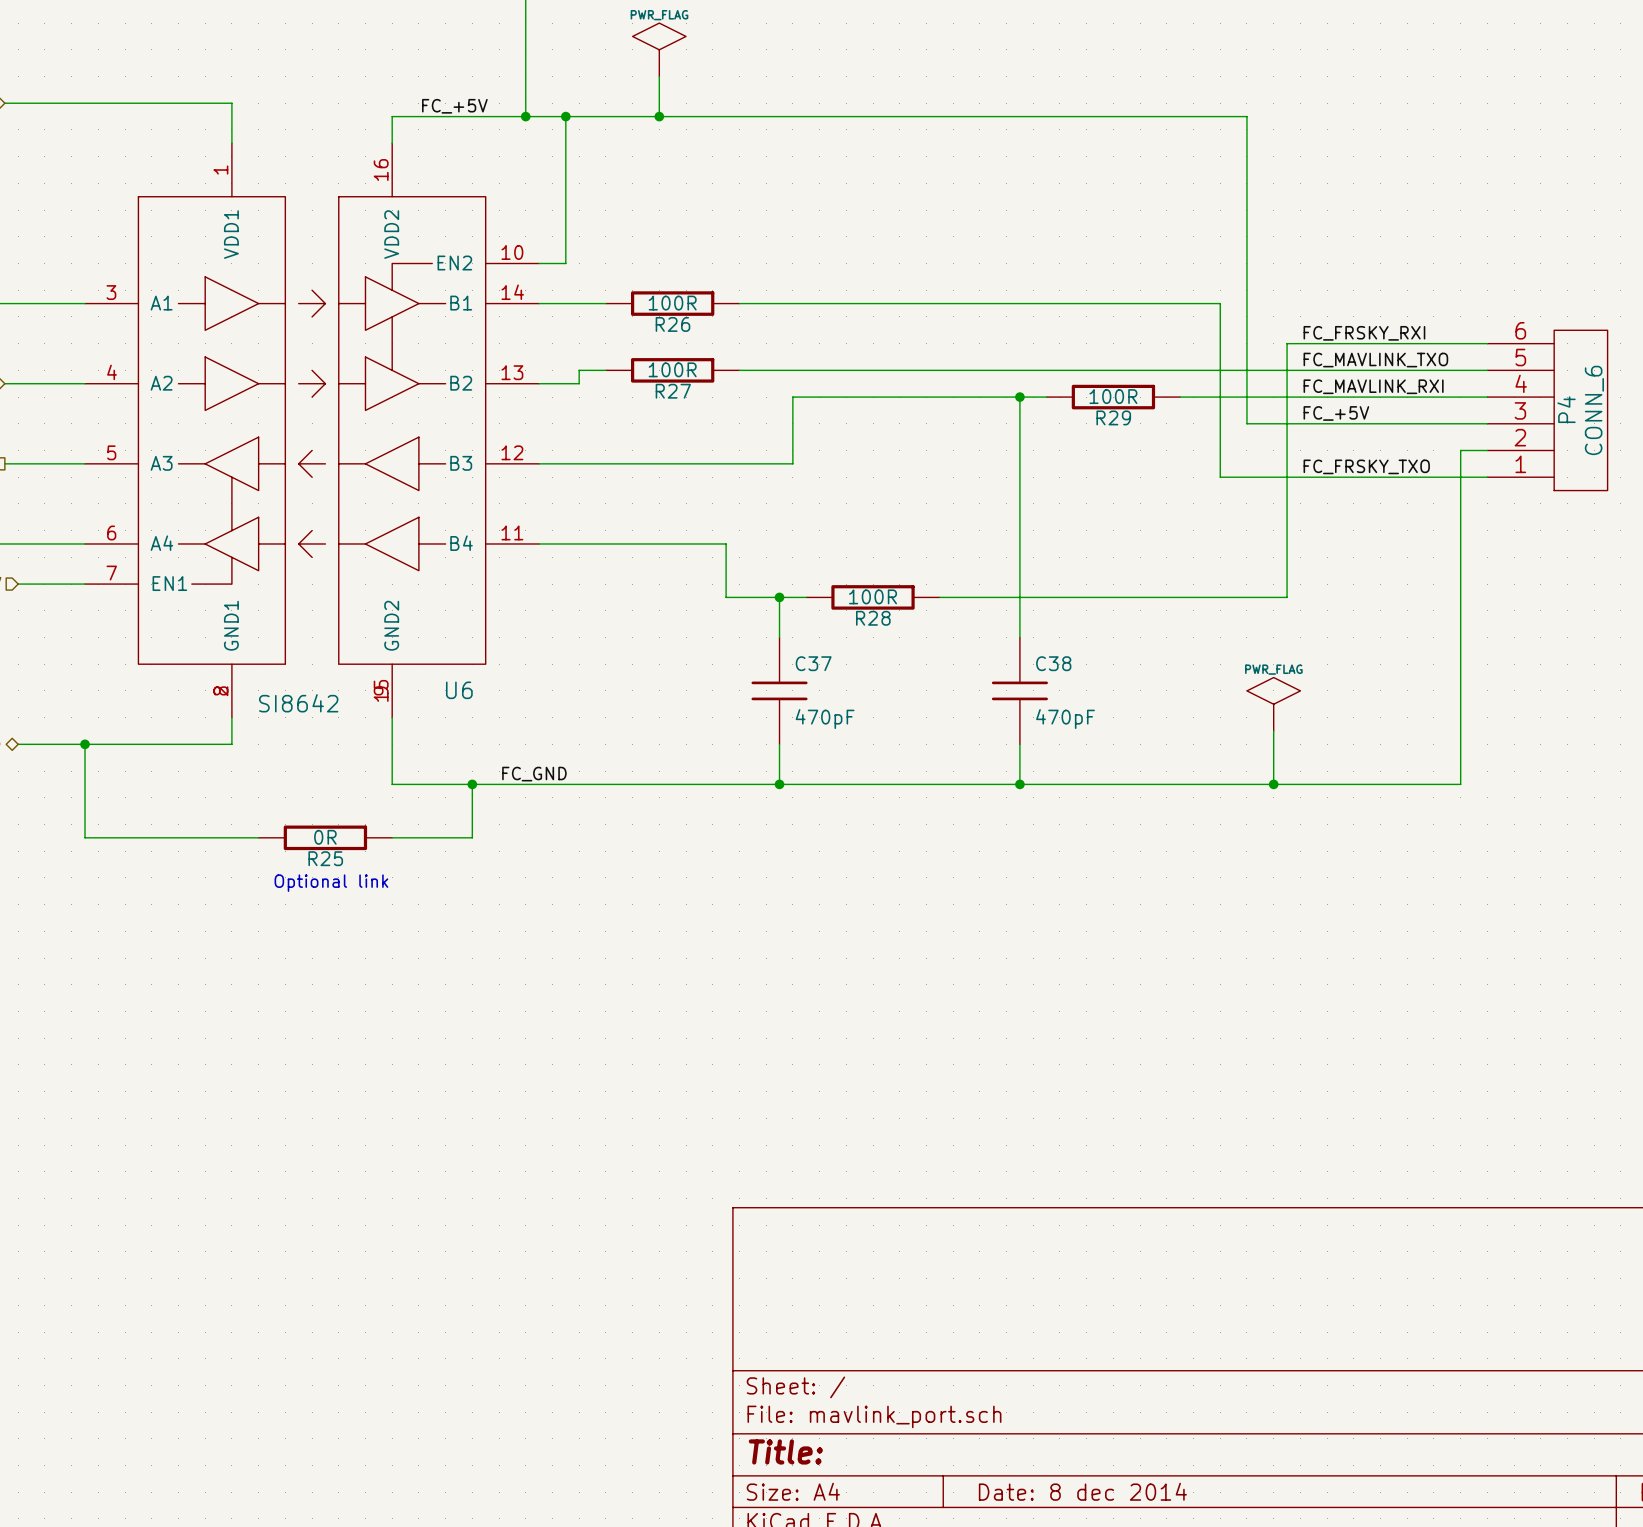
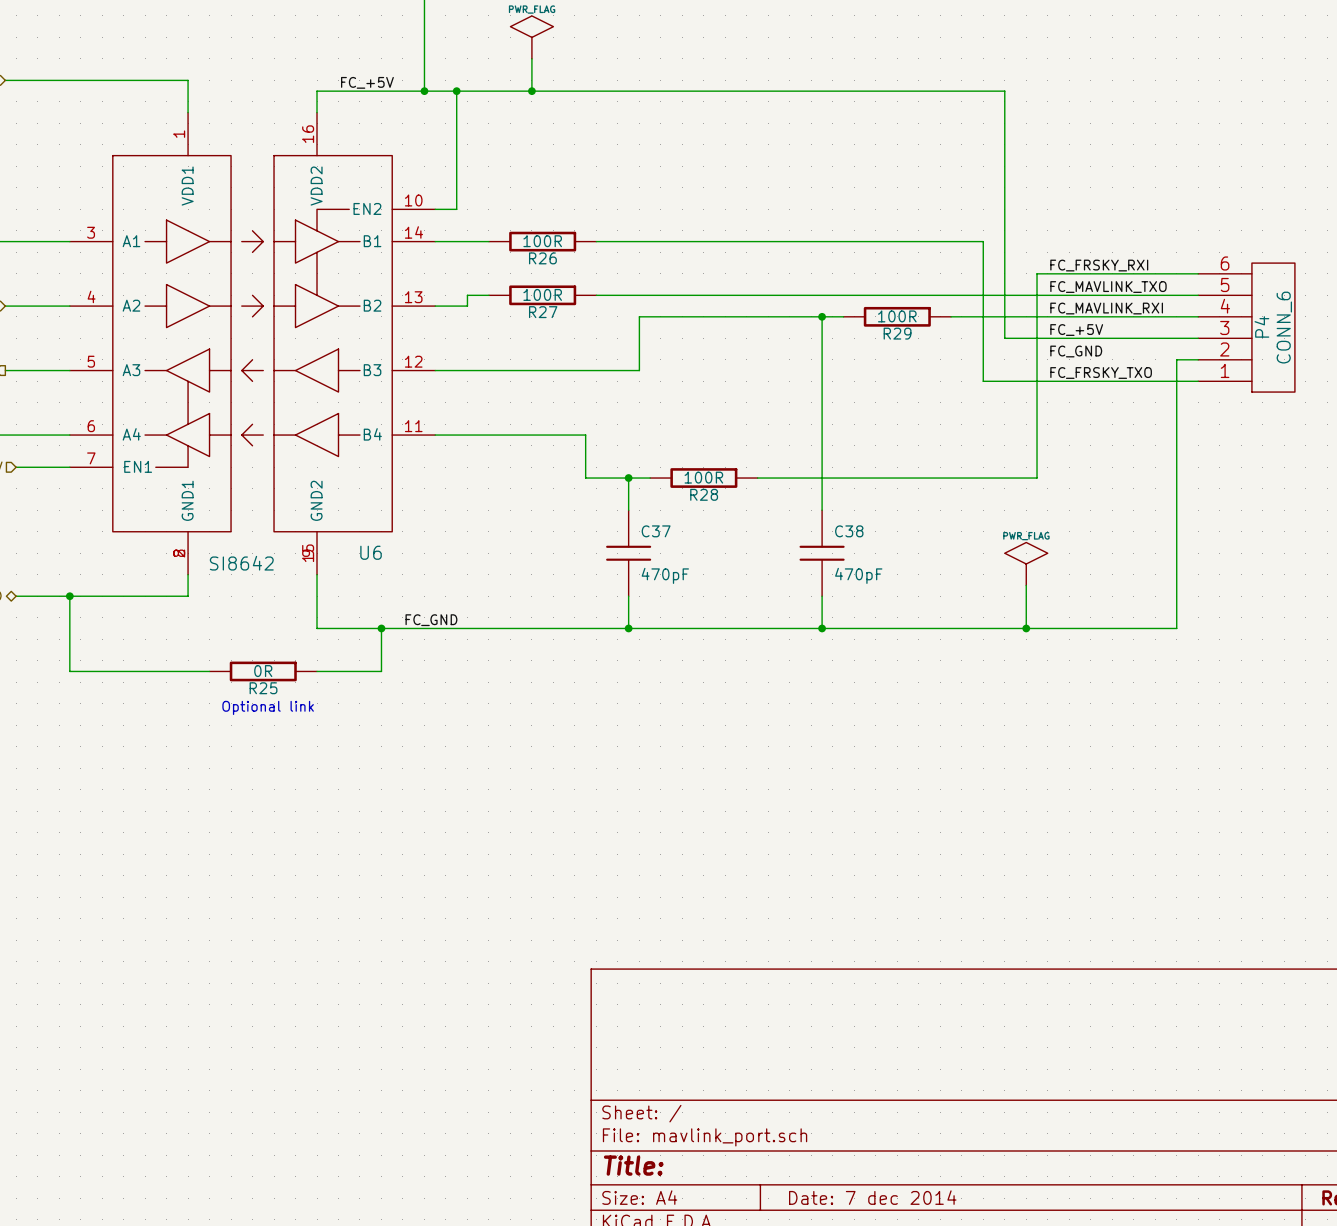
label: none -> FC_GND (1076, 351)
title block: Date: 8 dec 2014 (1082, 1491) -> Date: 7 dec 2014 (872, 1197)

